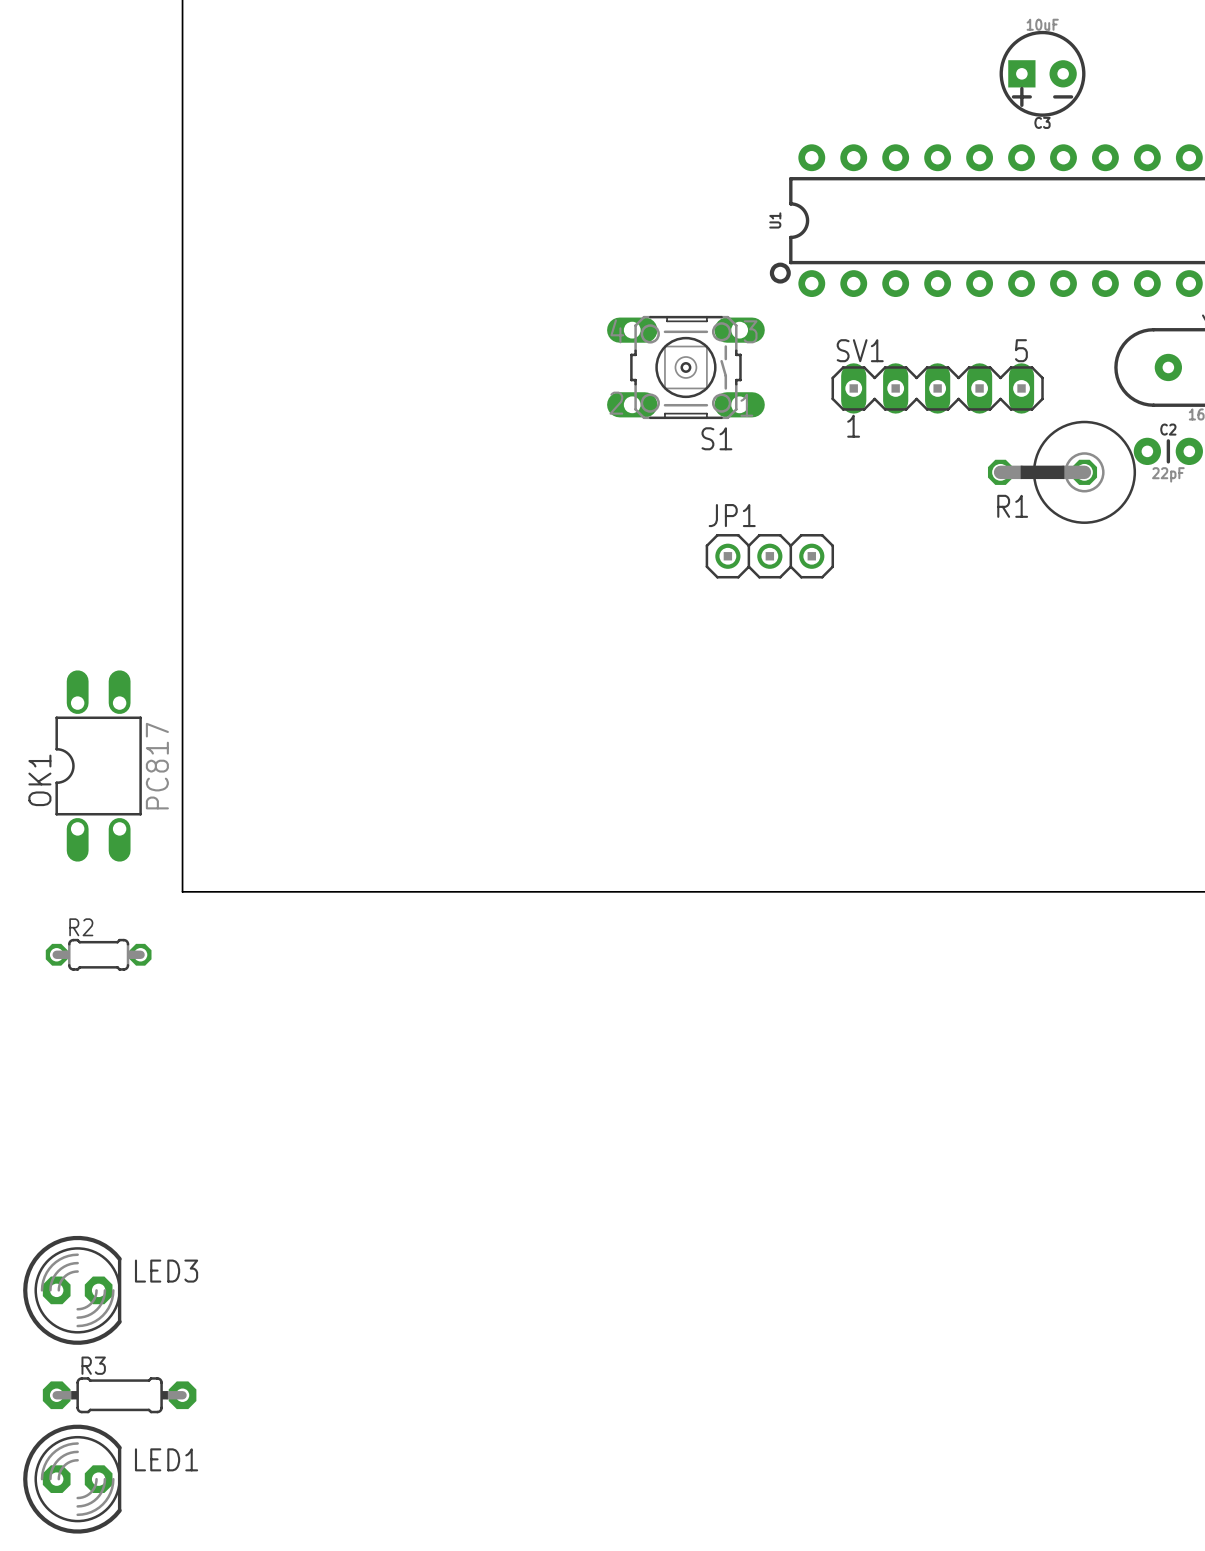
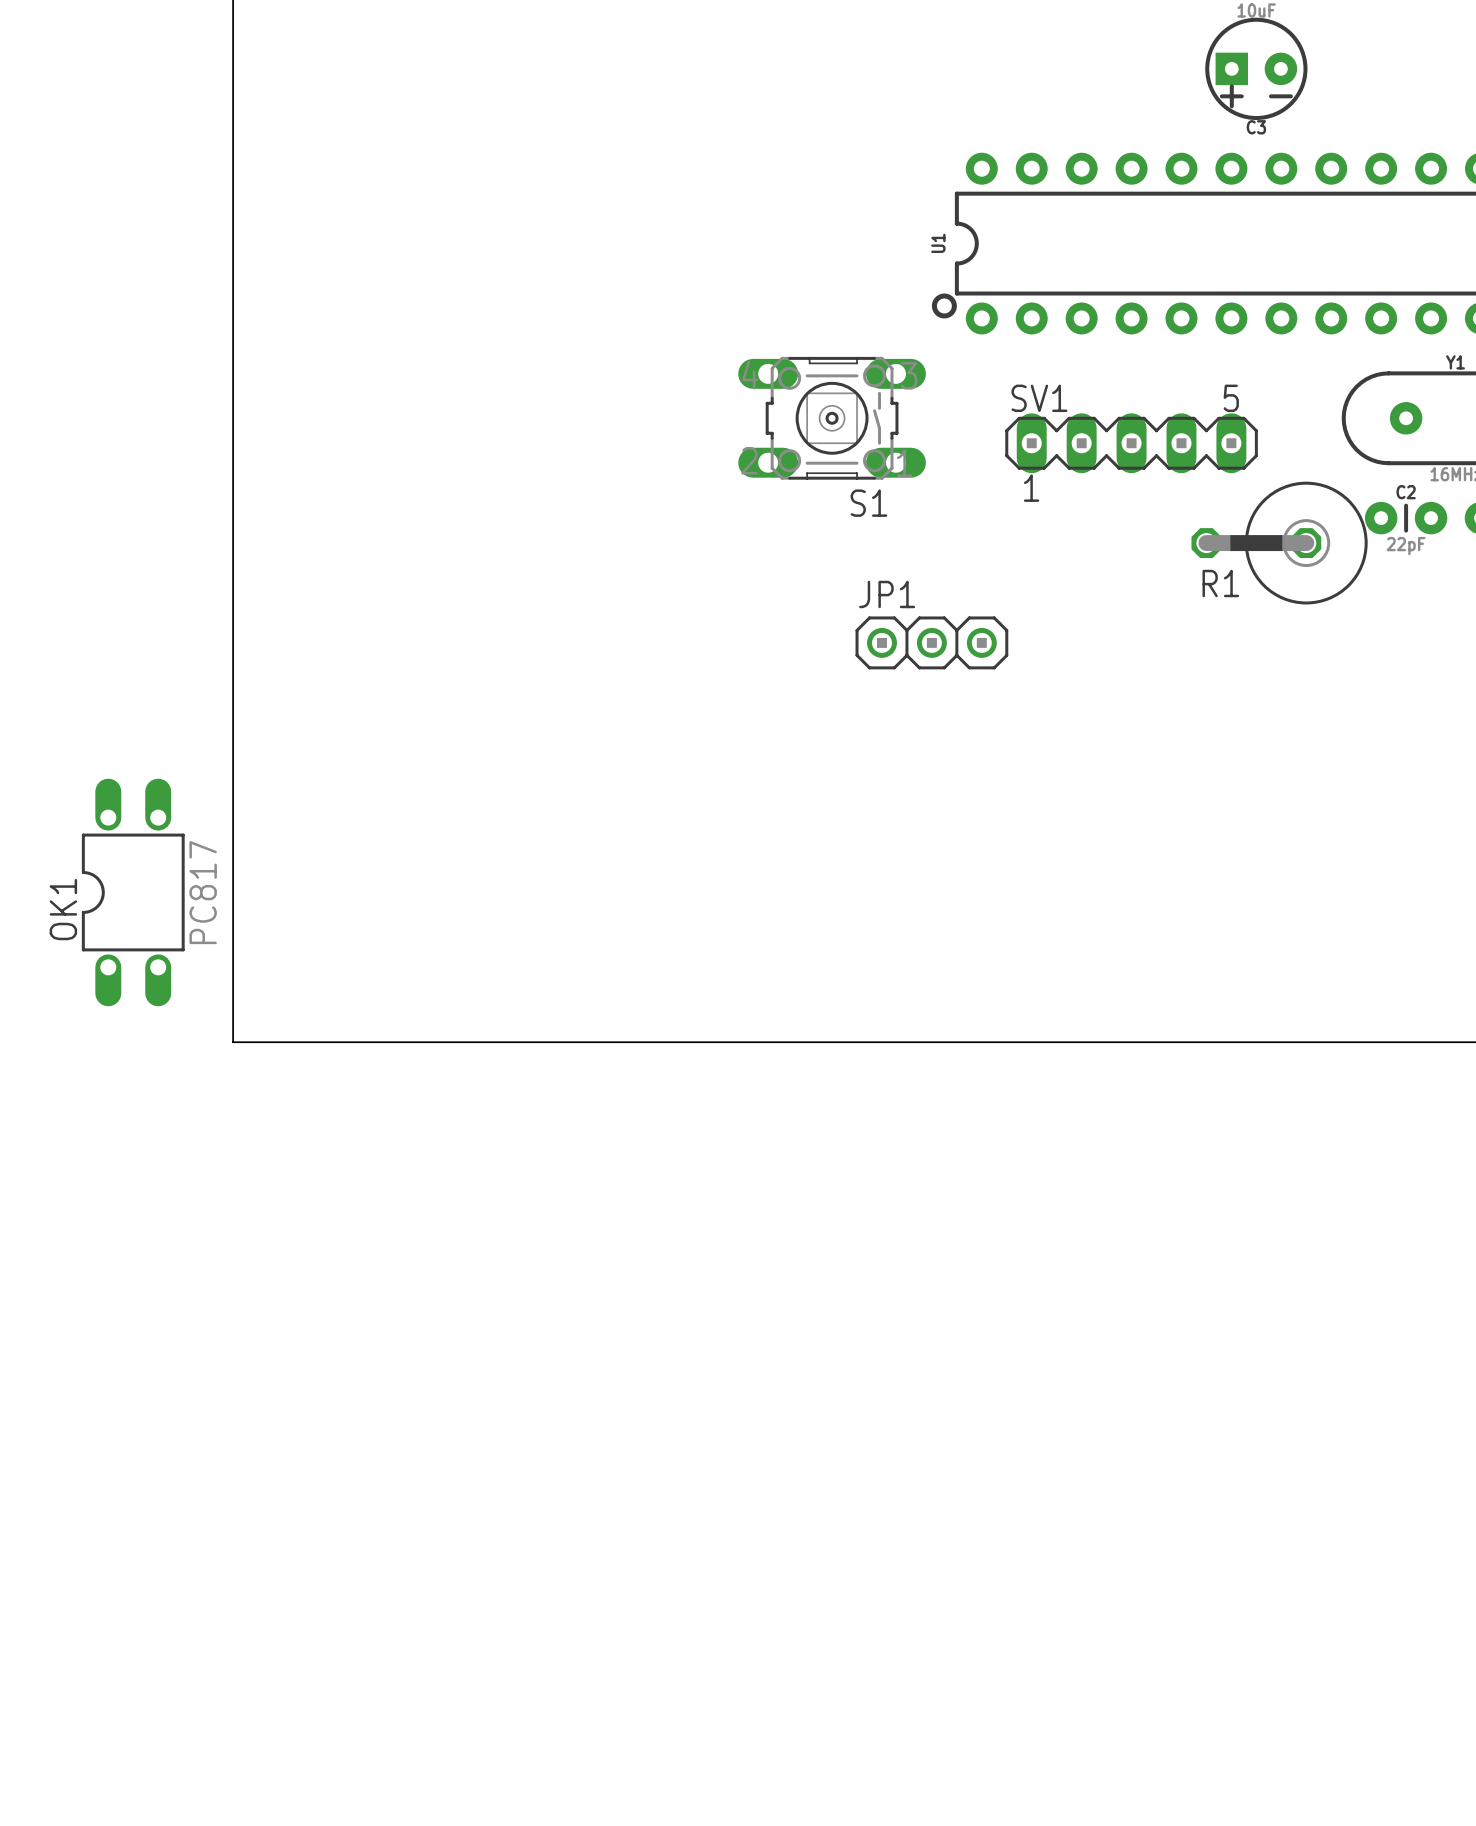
R2: (98, 954) -> none
LED3: (72, 1290) -> none
R3: (119, 1395) -> none
LED1: (72, 1479) -> none

